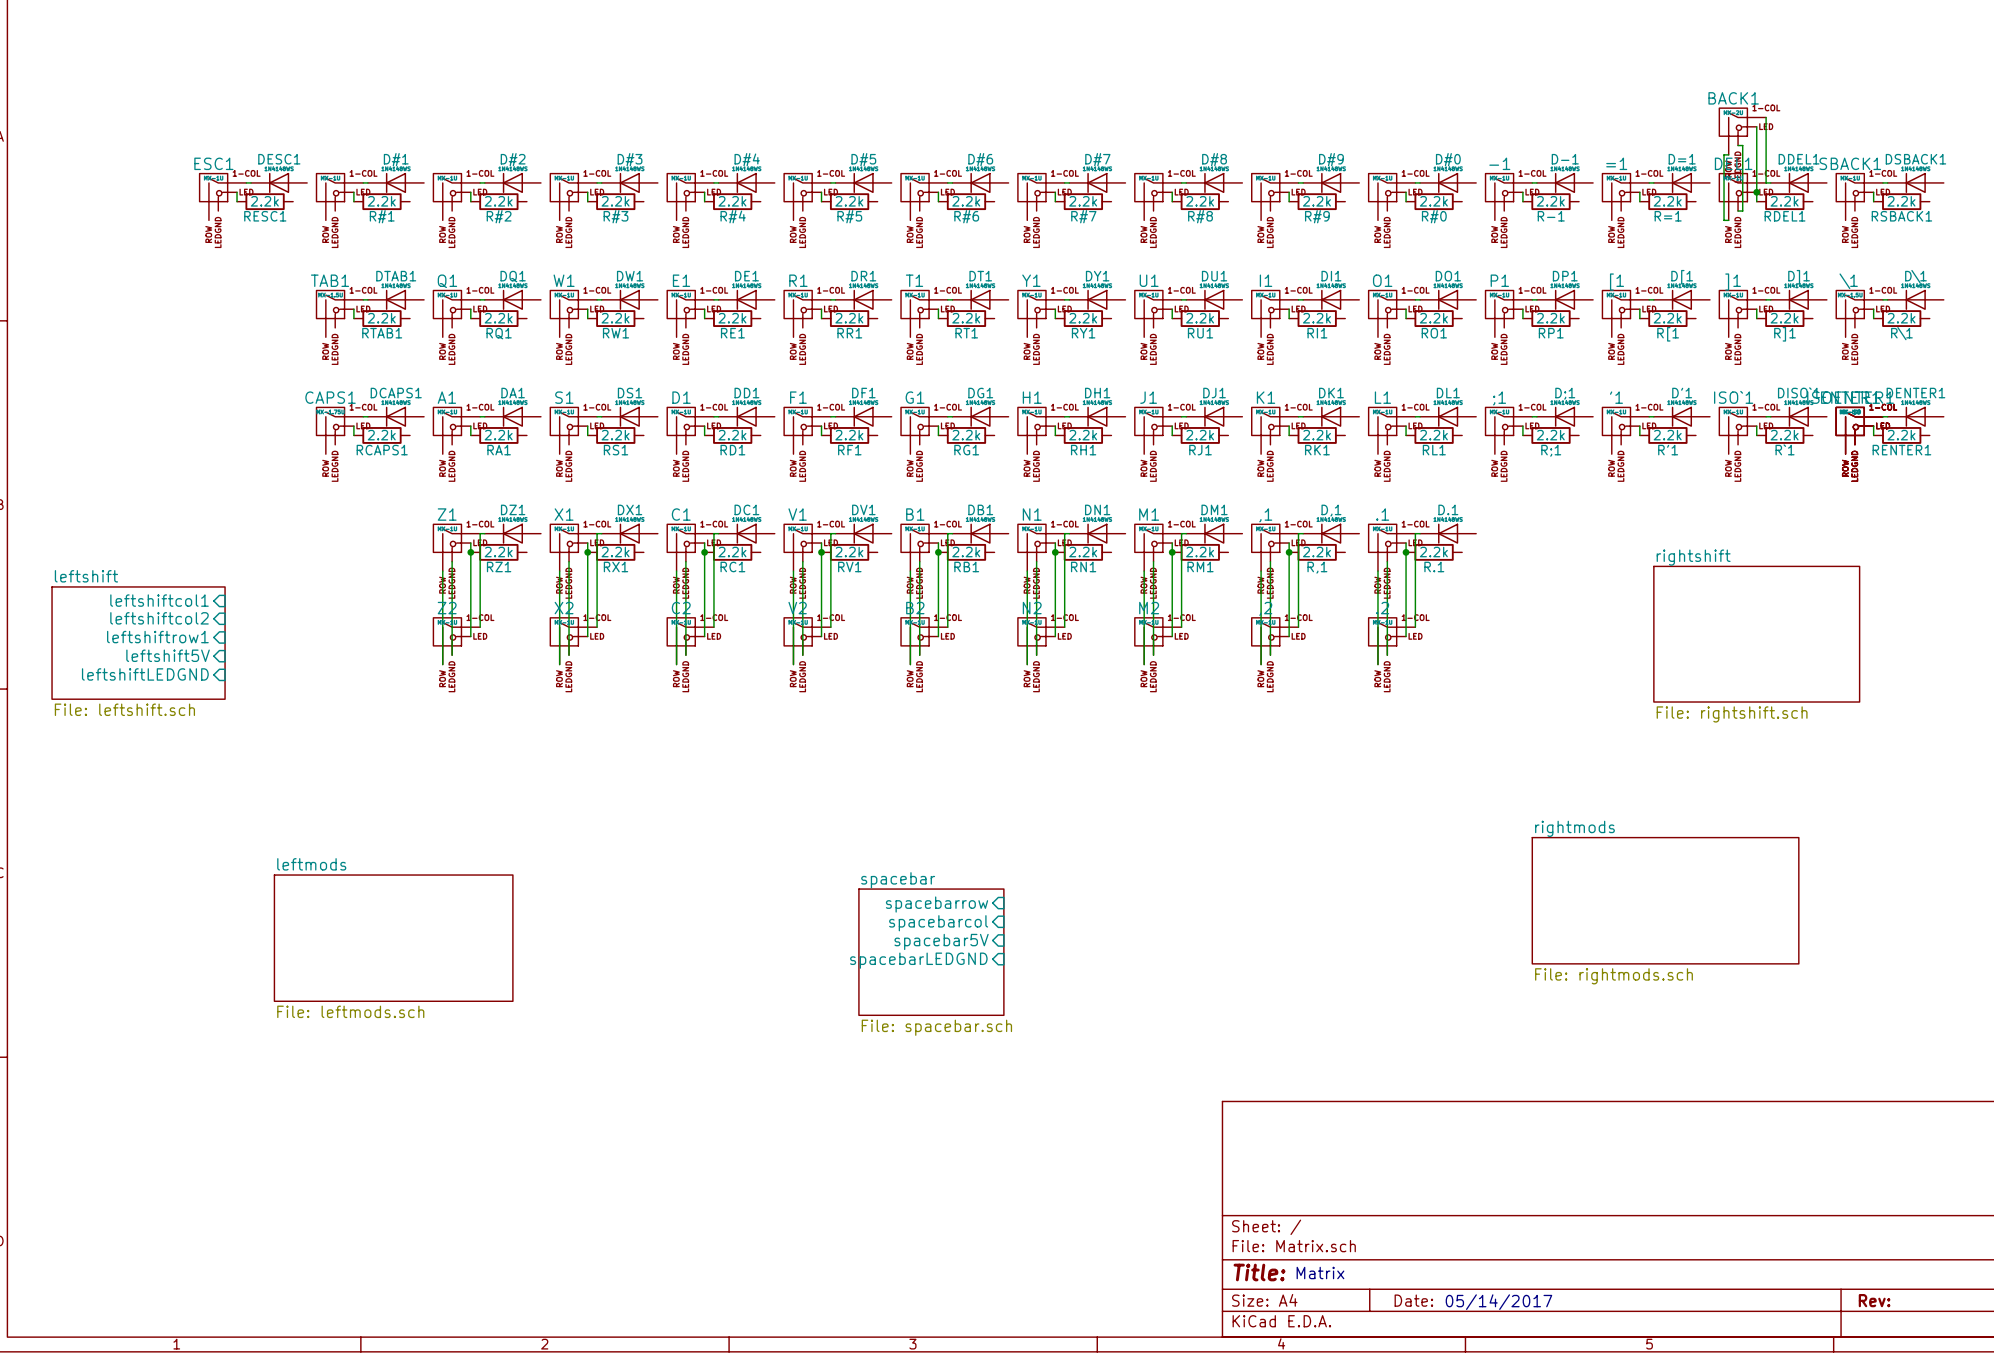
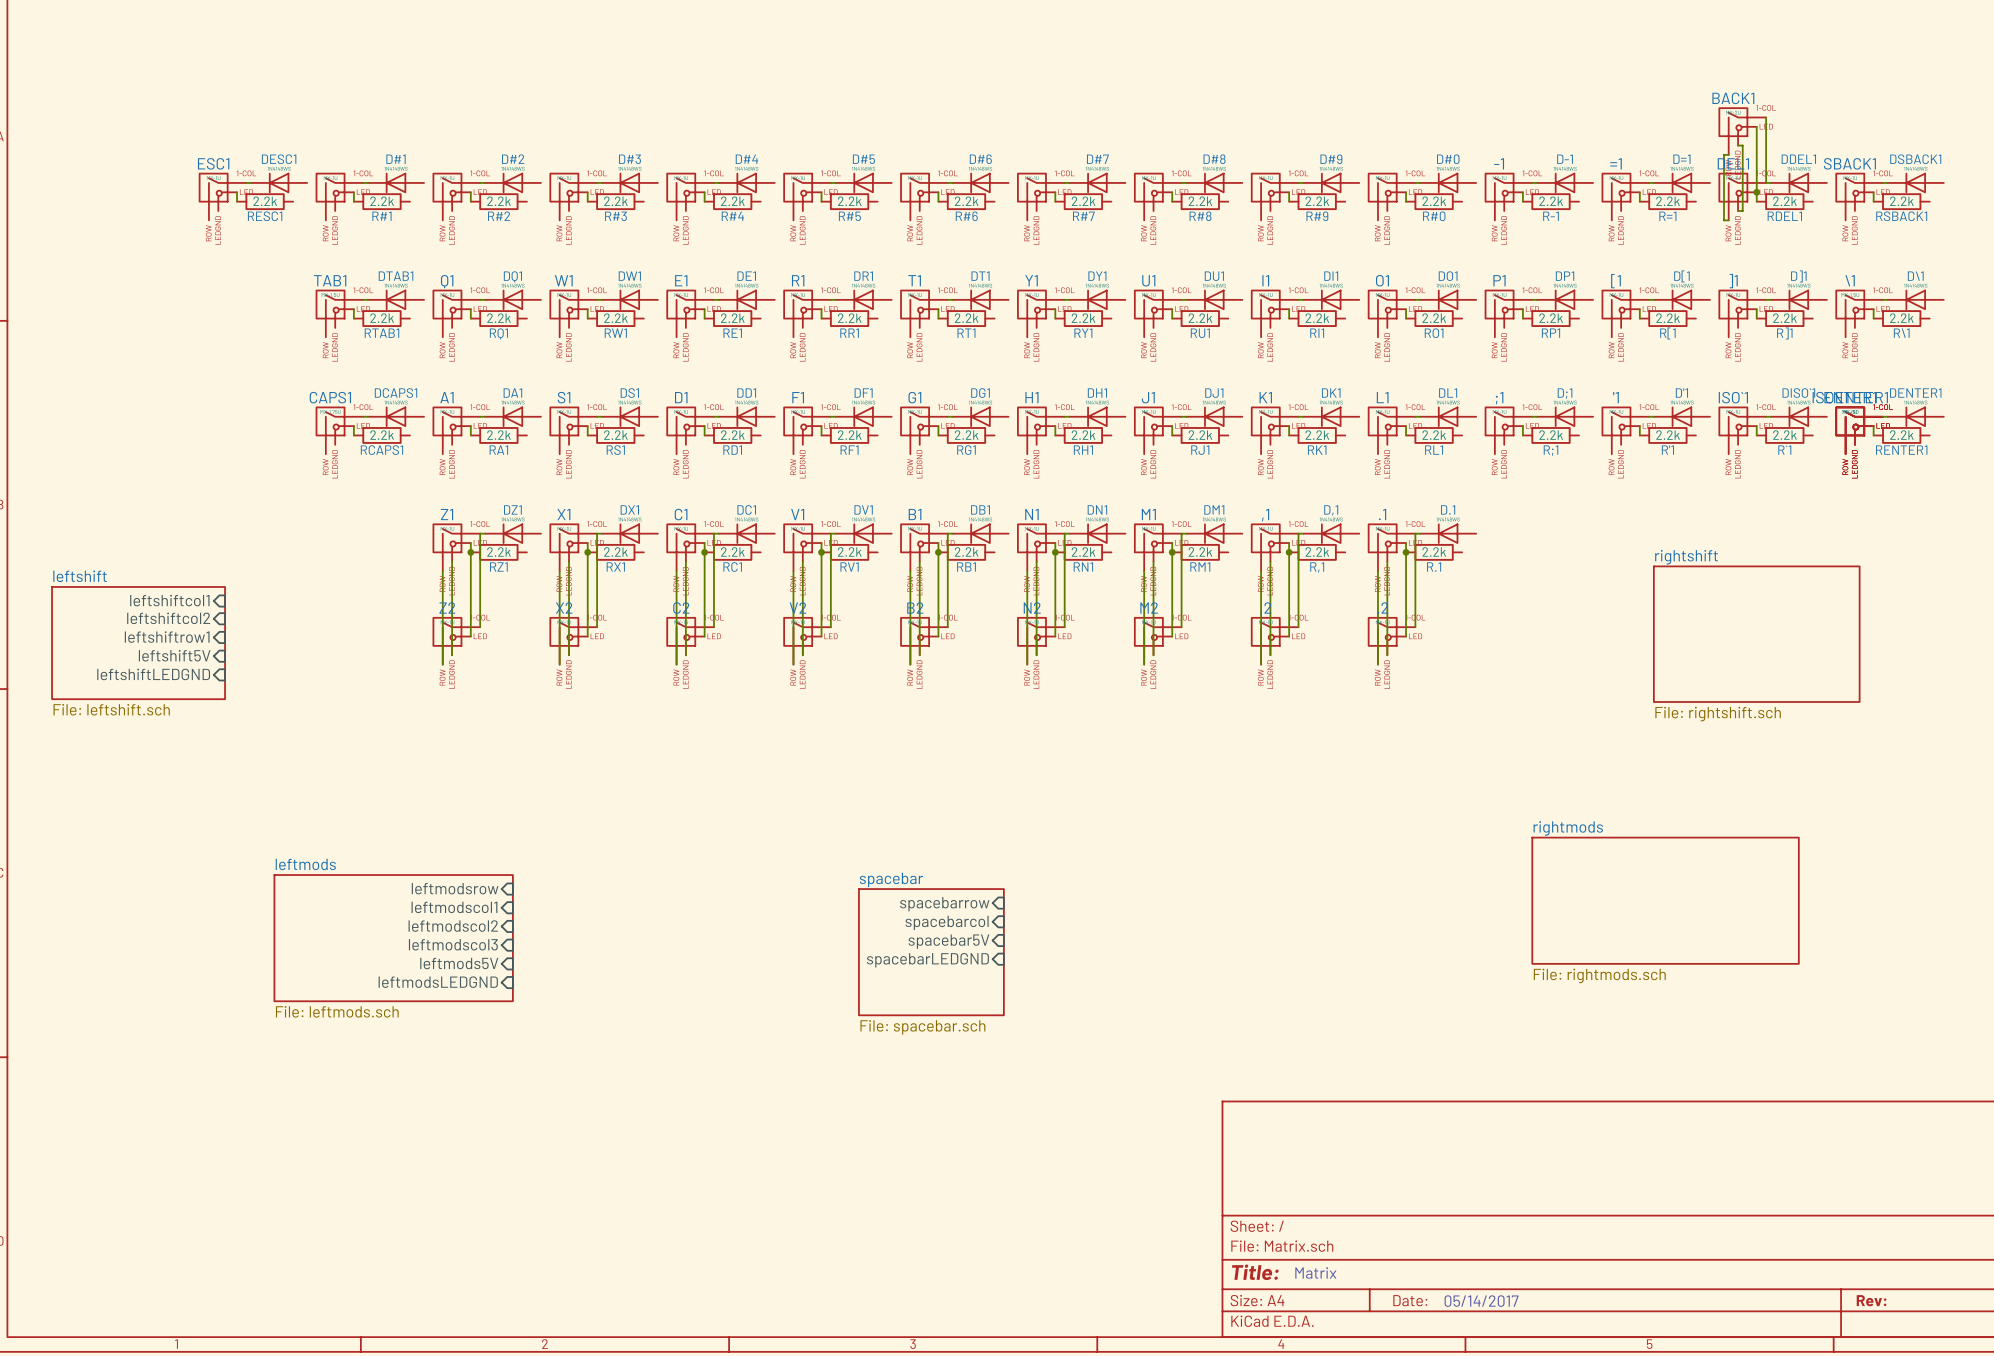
sheet pin: none -> leftmodsrow (455, 888)
sheet pin: none -> leftmodscol1 (454, 907)
sheet pin: none -> leftmodscol2 (453, 926)
sheet pin: none -> leftmodscol3 (453, 944)
sheet pin: none -> leftmods5V (459, 963)
sheet pin: none -> leftmodsLEDGND (438, 982)

